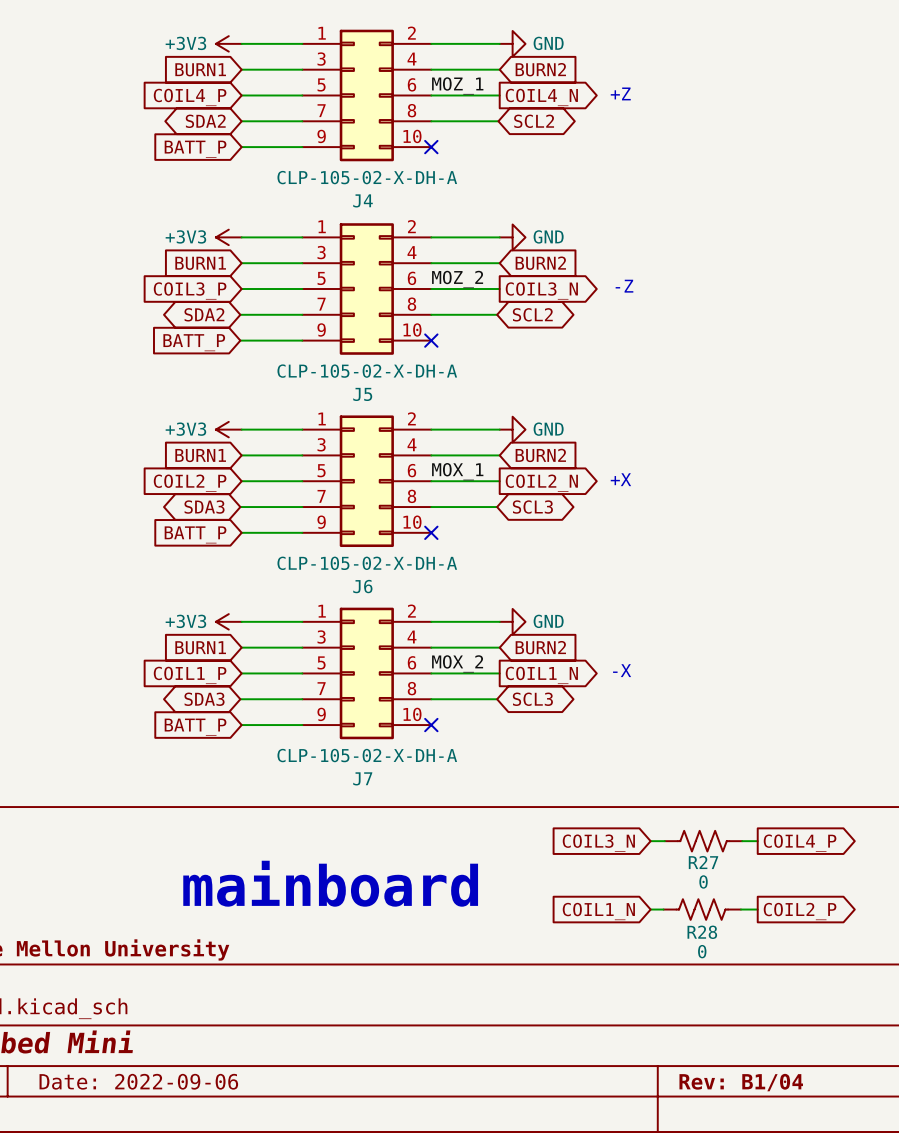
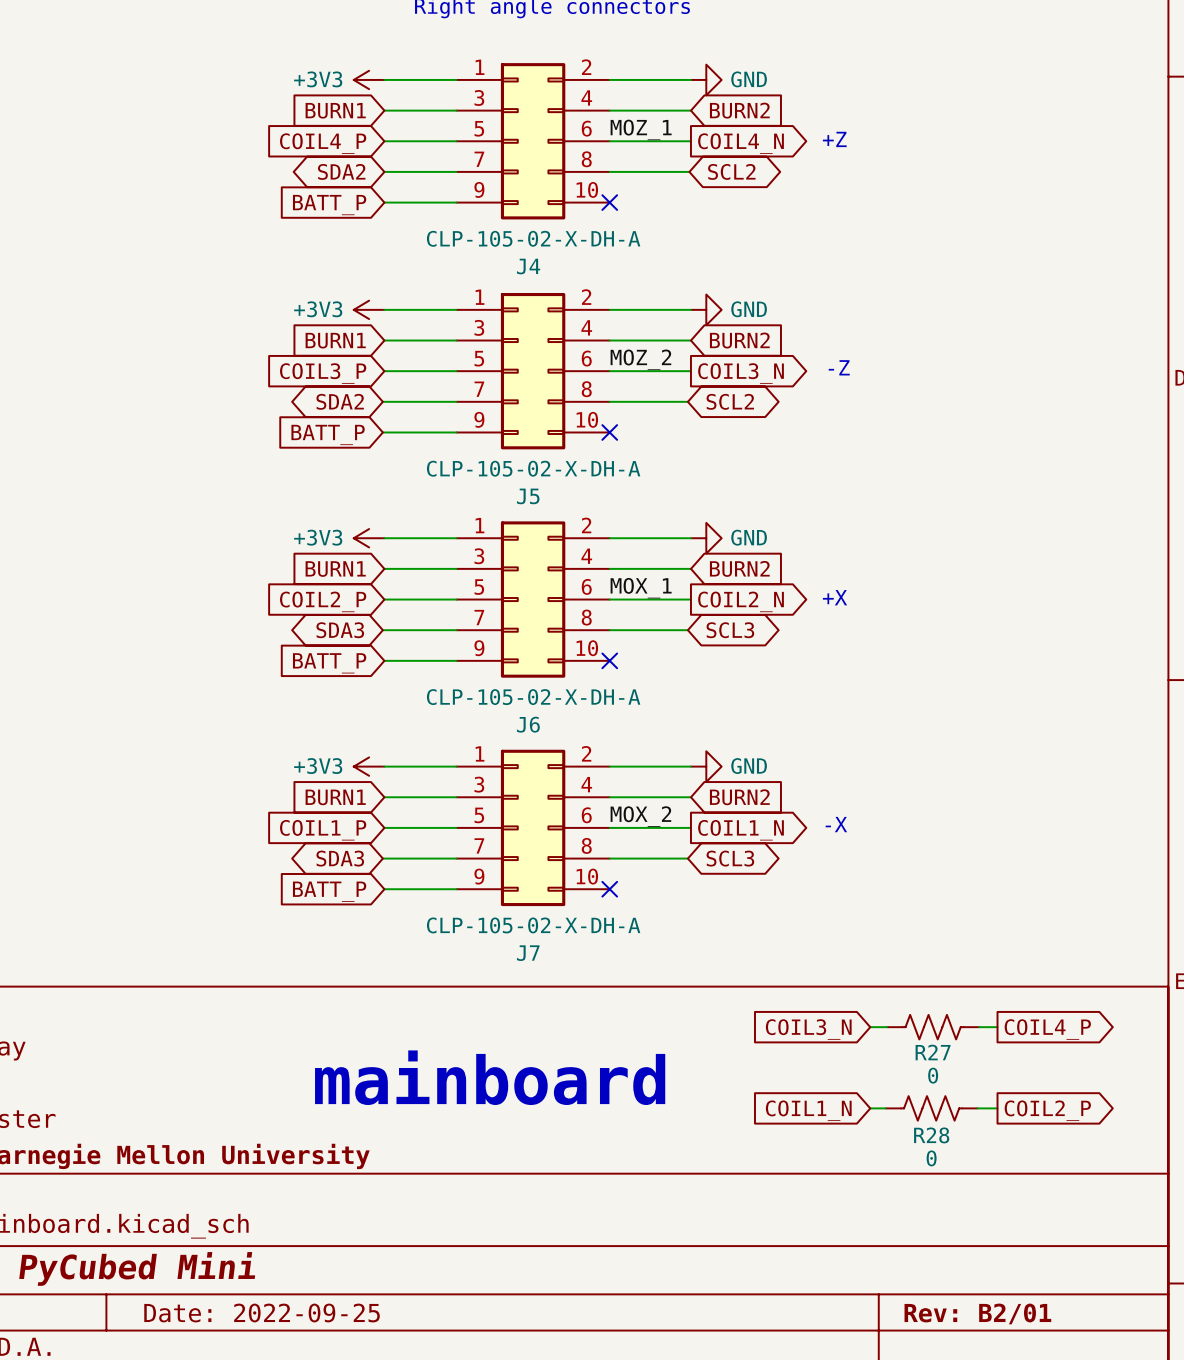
title block: Date: 2022-09-06 (138, 1081) -> Date: 2022-09-25 (262, 1313)
title block: Rev: B1/04 (741, 1082) -> Rev: B2/01 (977, 1313)

